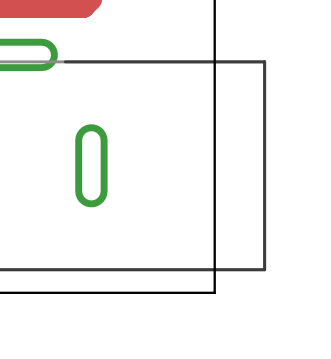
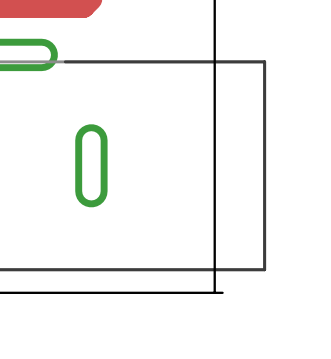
board edge: none -> (214, 292) (222, 292)

